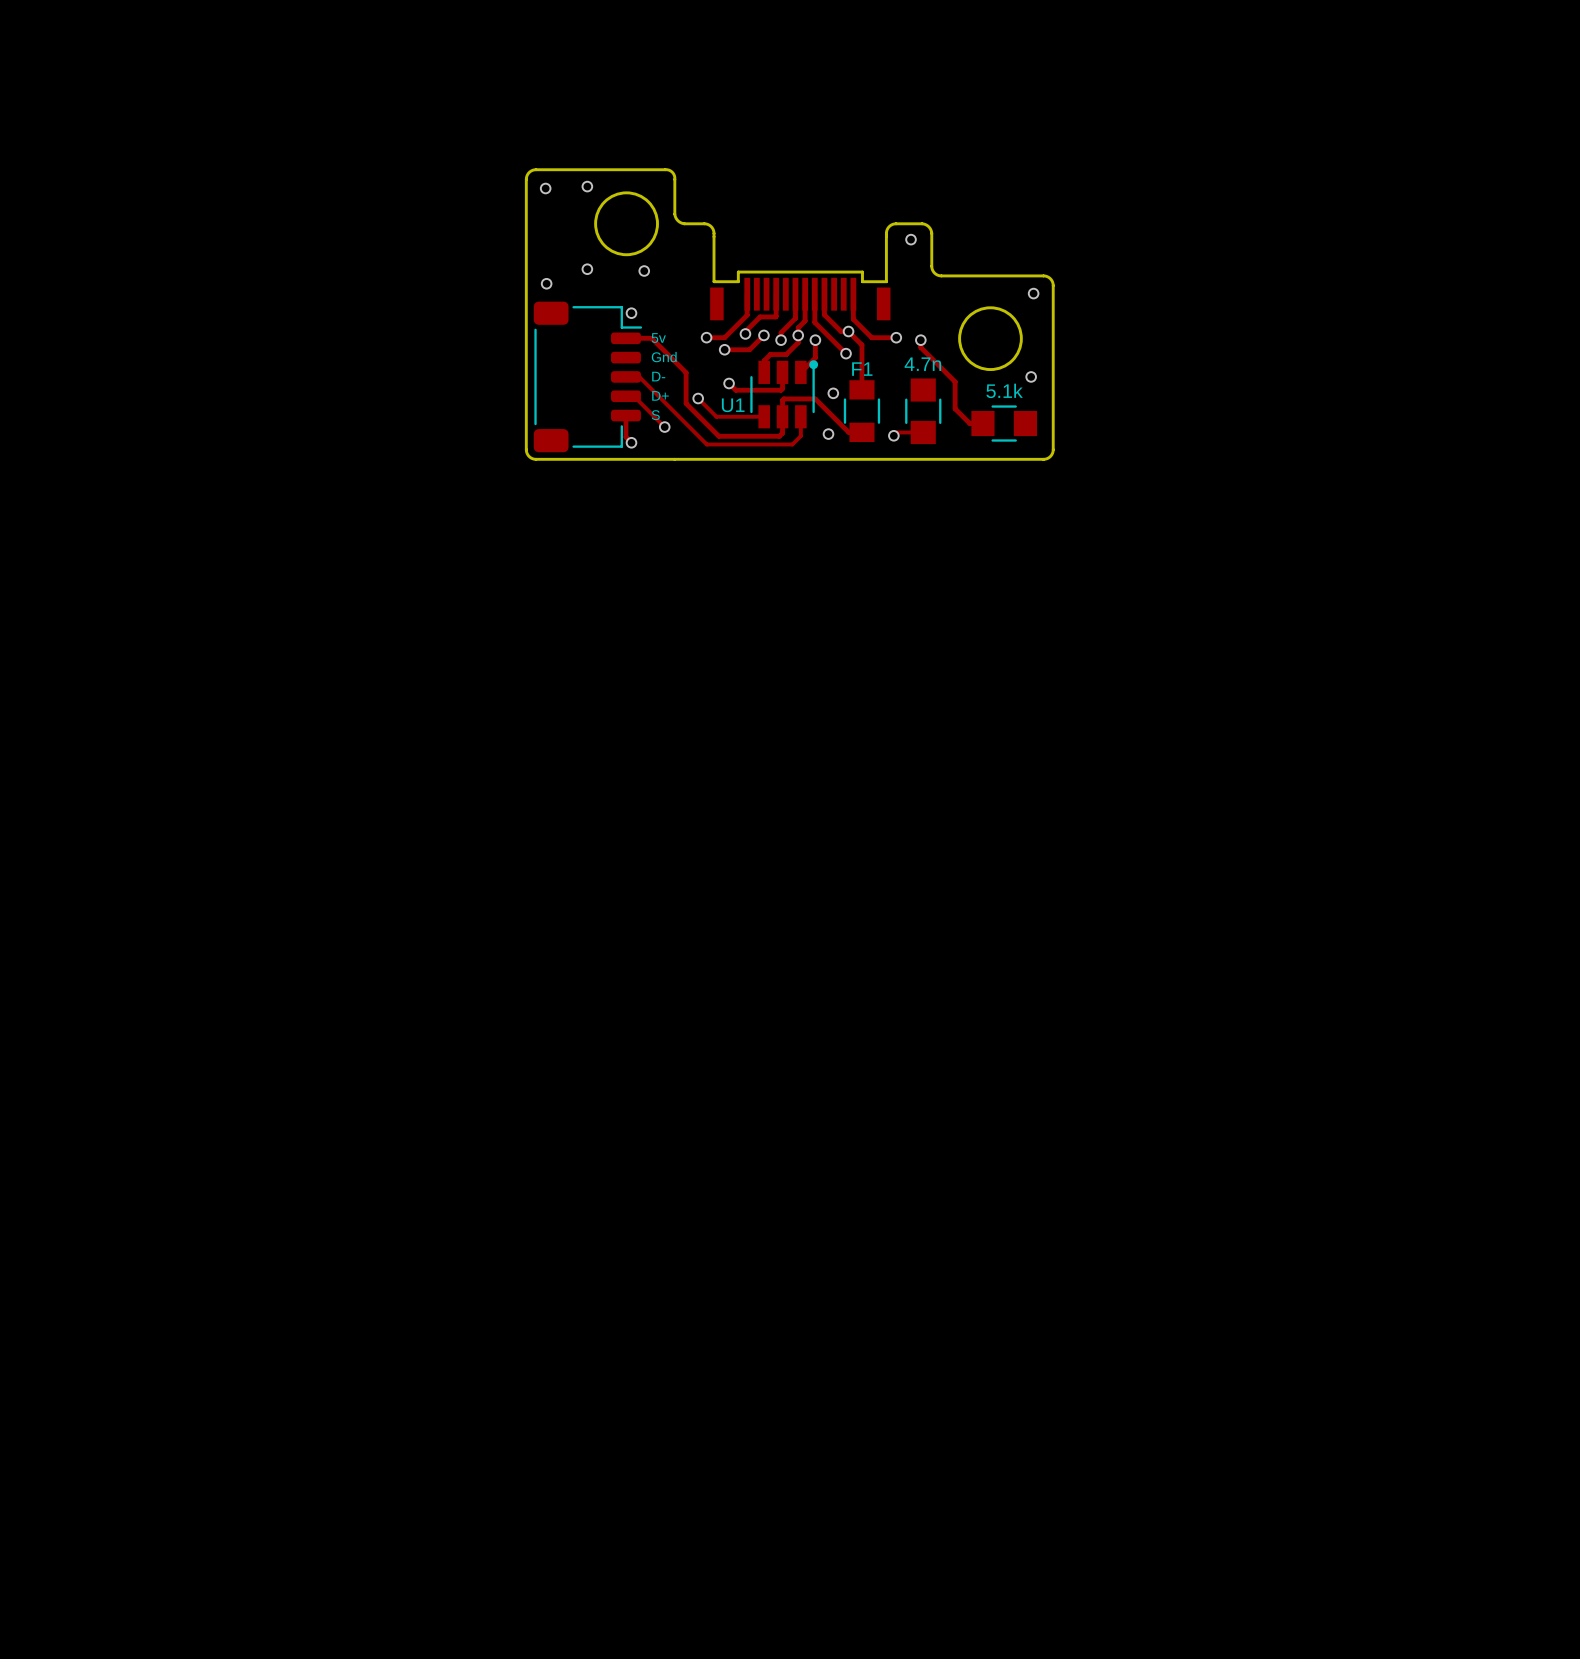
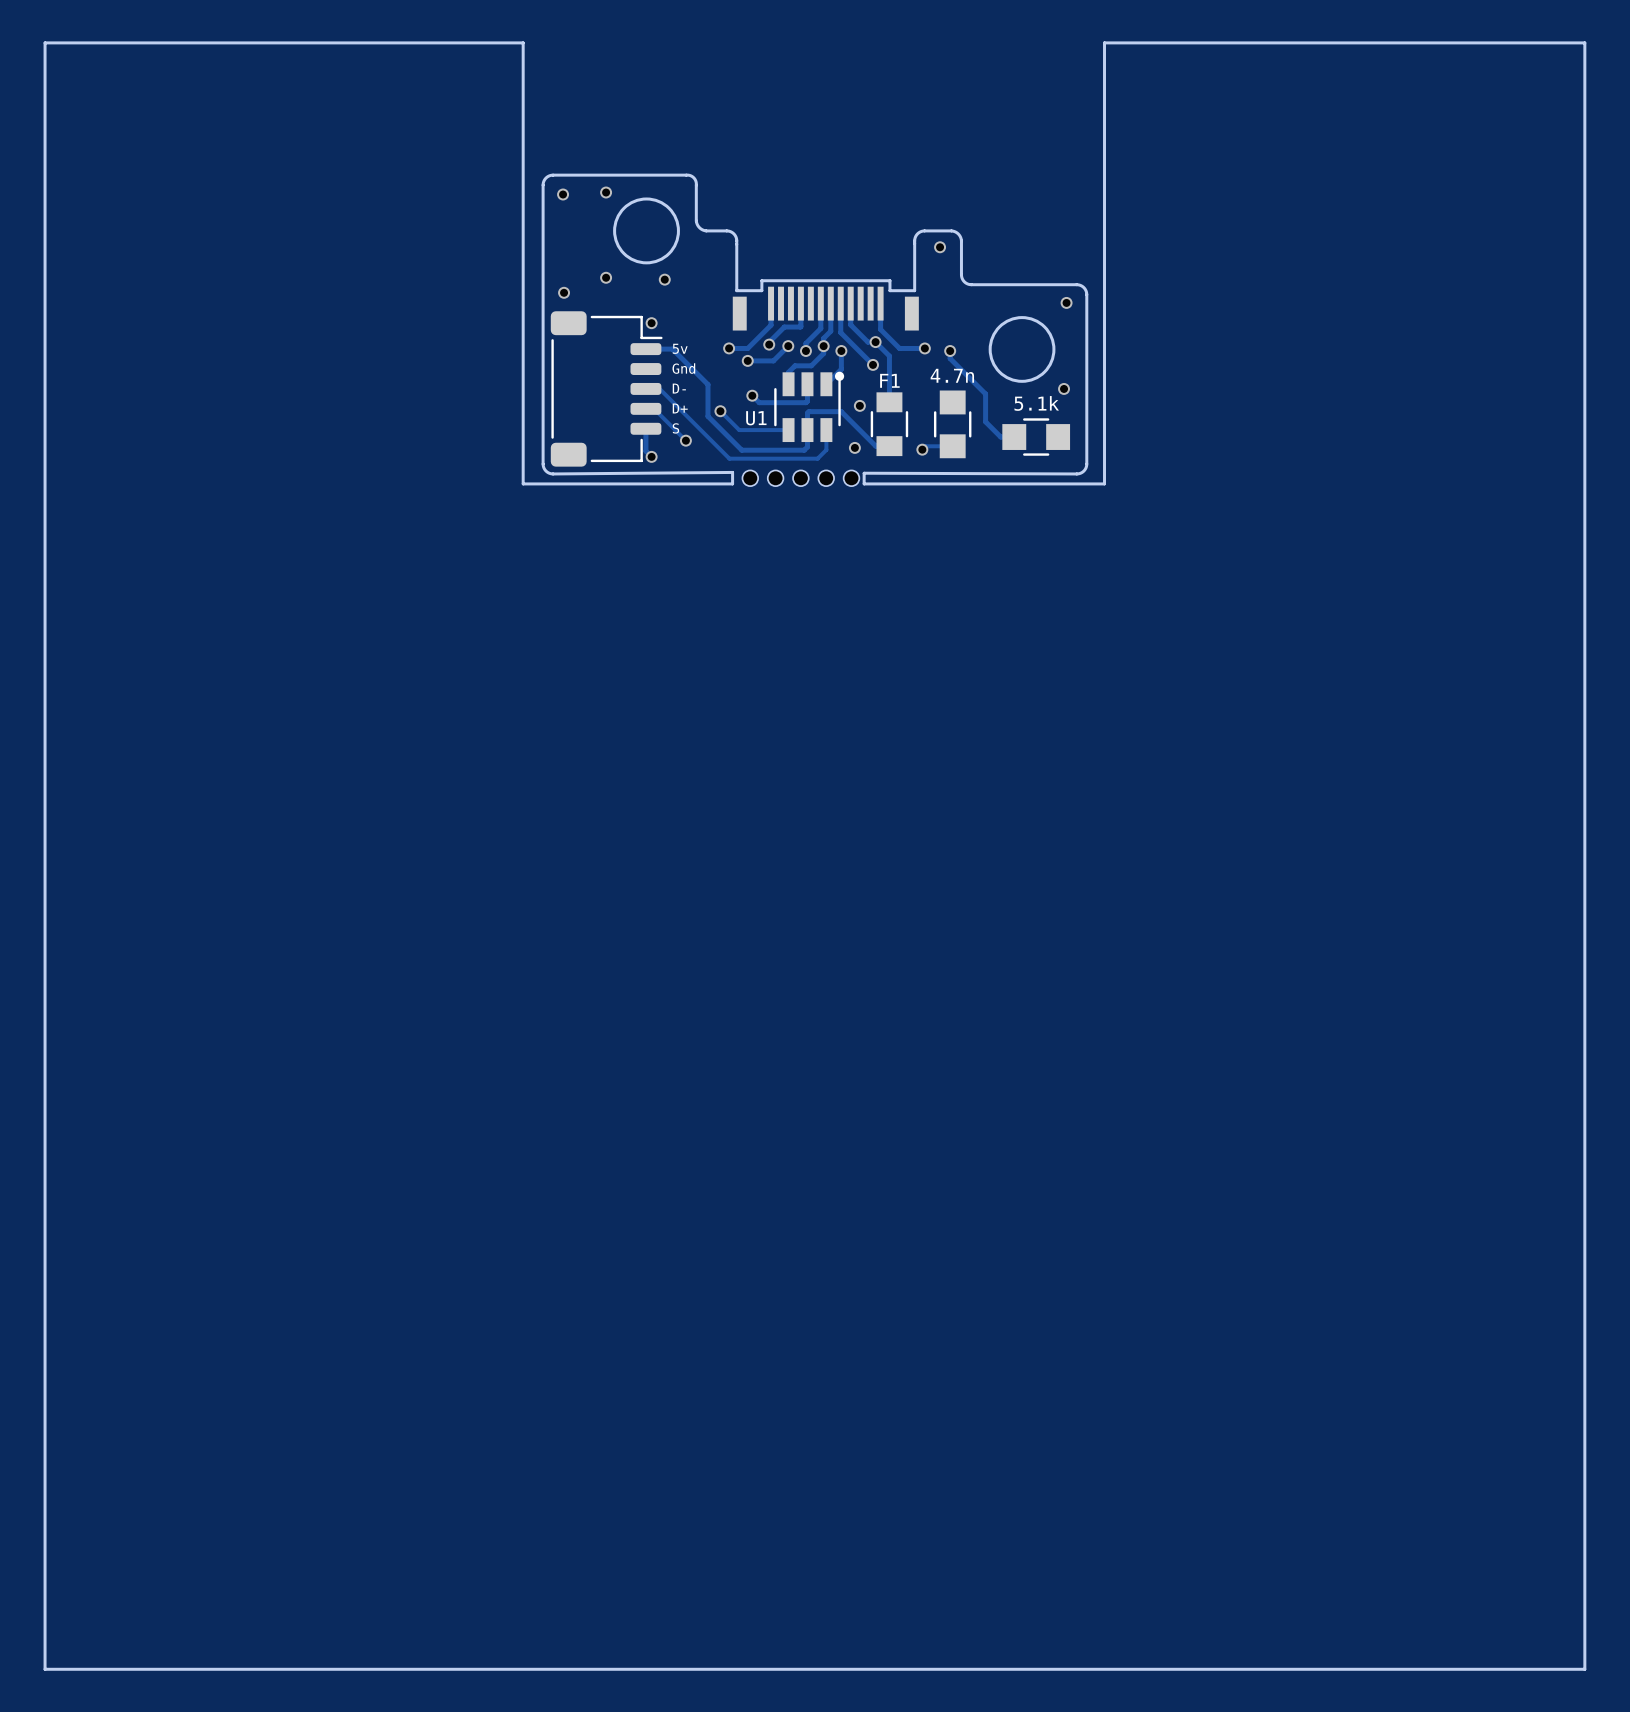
board edge: (535, 459) (1043, 459) -> (553, 473) (732, 472) (732, 483) (523, 483) (523, 42) (45, 42) (45, 1669) (1584, 1669) (1584, 42) (1104, 42) (1104, 483) (864, 483) (864, 473) (1076, 473)
part: none -> (800, 478)

